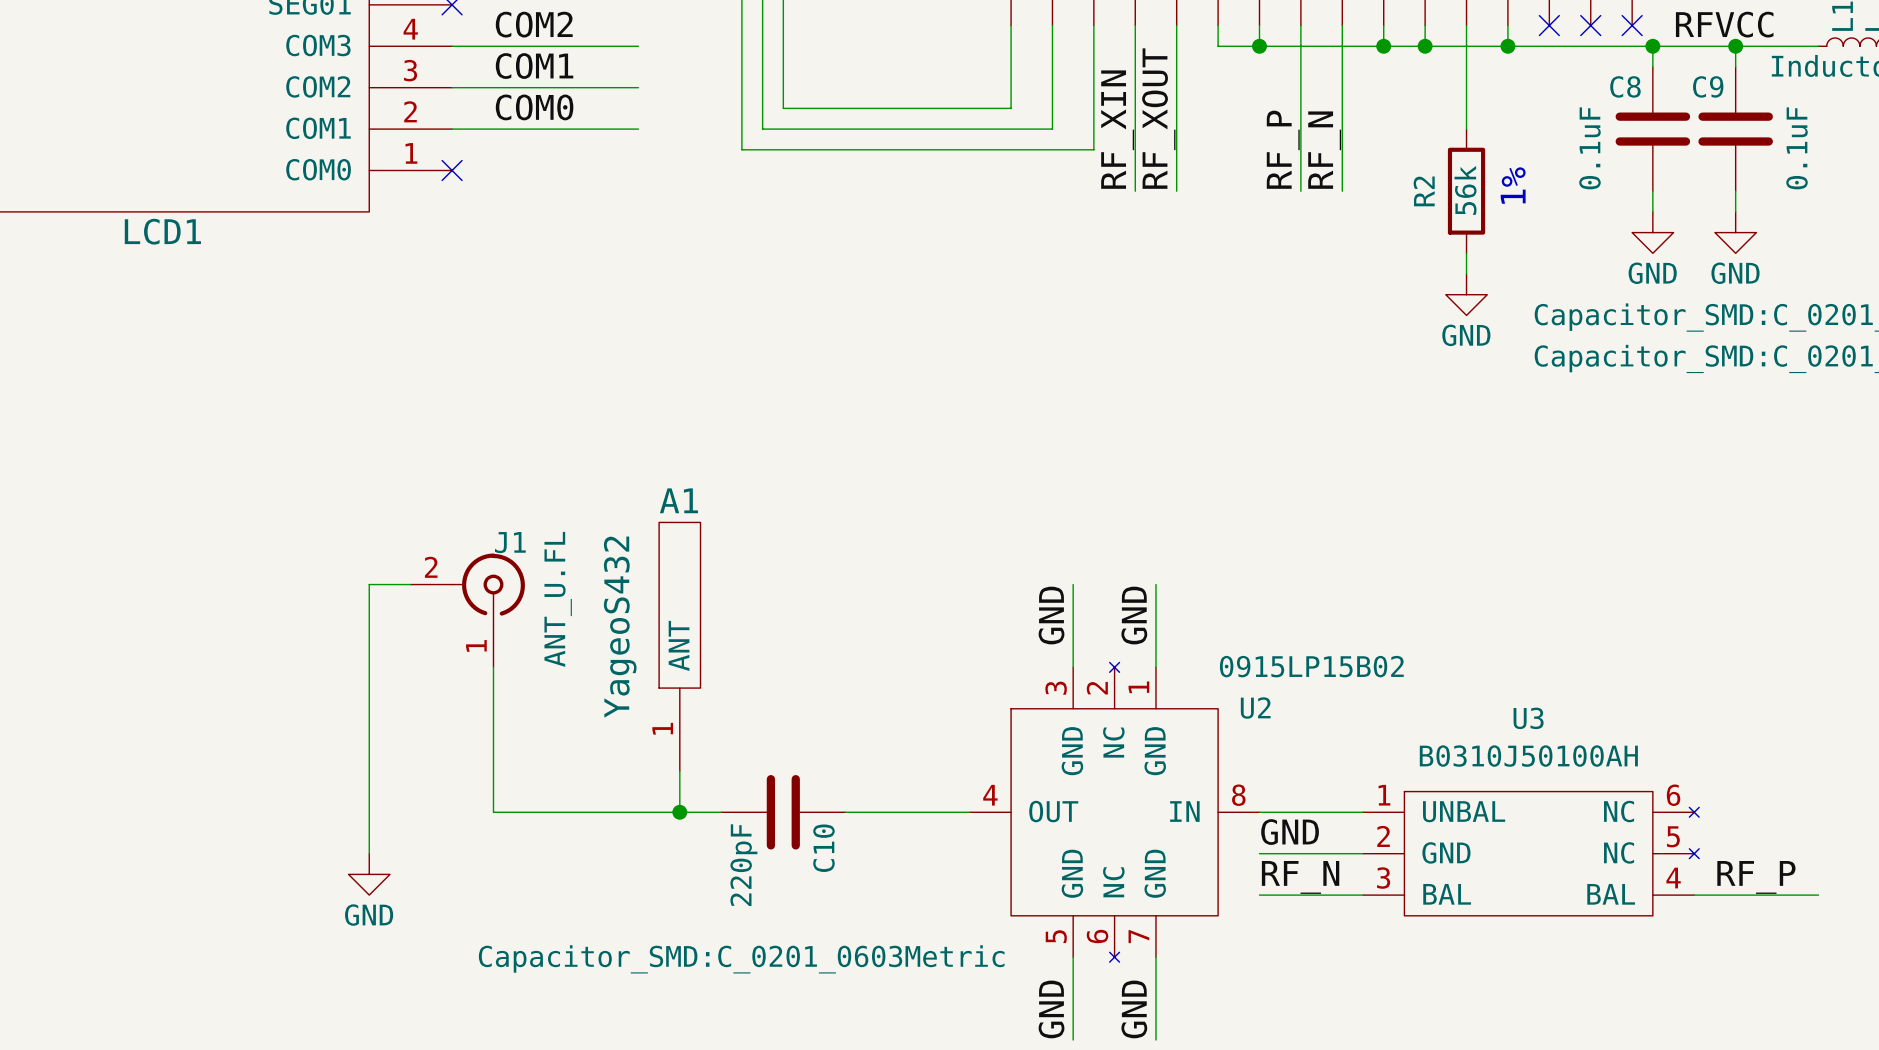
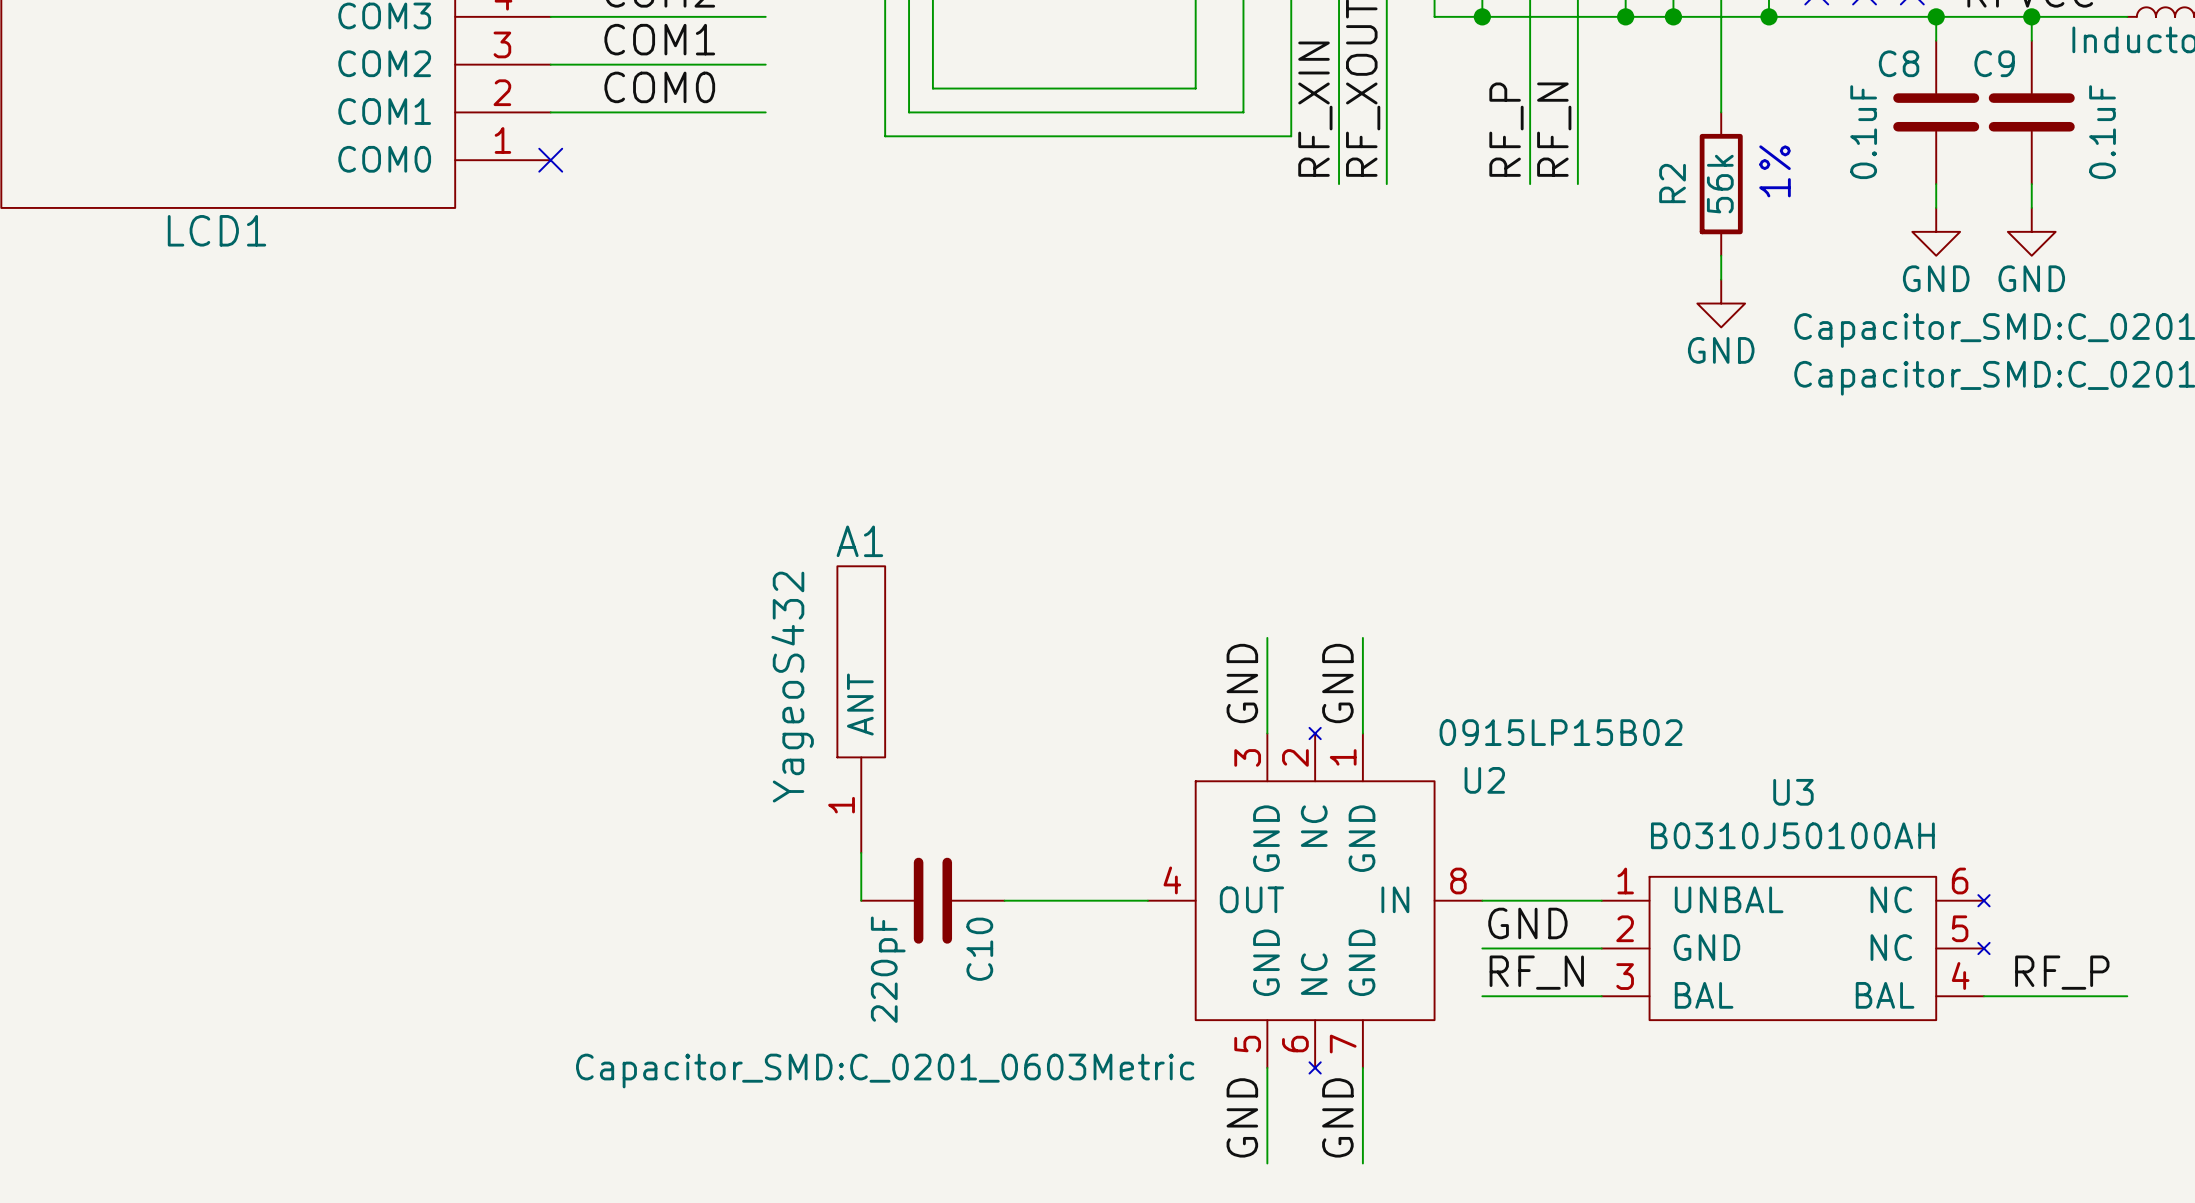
wire: (410, 584) (369, 584) (369, 853) -> none
J1: ANT_U.FL (467, 610) -> none
A1 position: (679, 646) -> (861, 709)
wire: (493, 667) (493, 812) (721, 812) -> (861, 852) (861, 900)
wire: (679, 770) (679, 812) -> none
junction: (679, 812) -> none
power symbol: GND (369, 874) -> none

